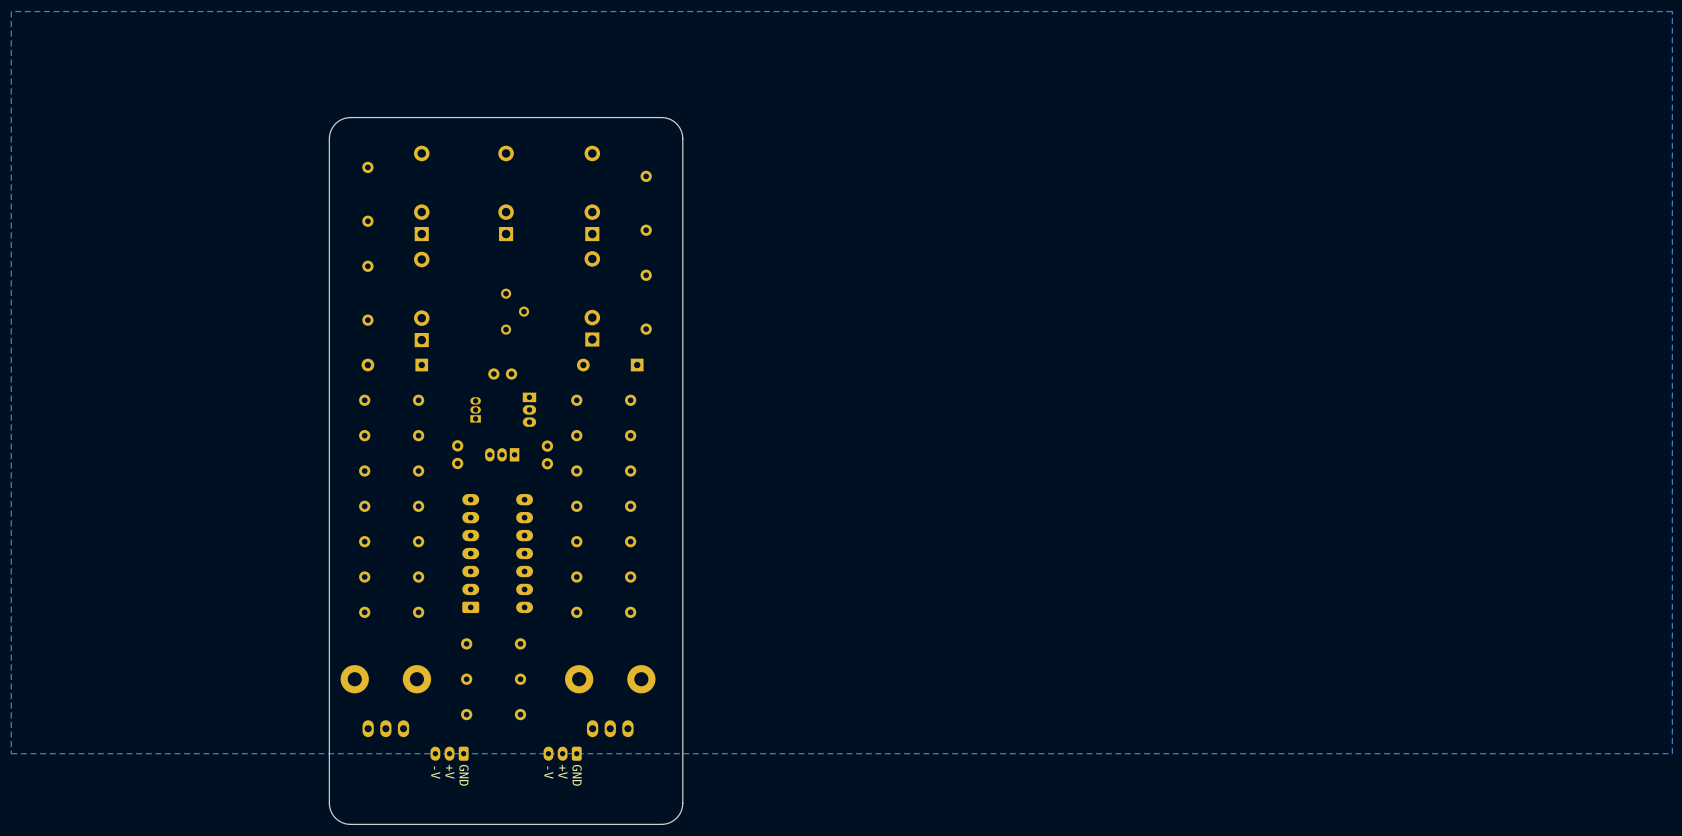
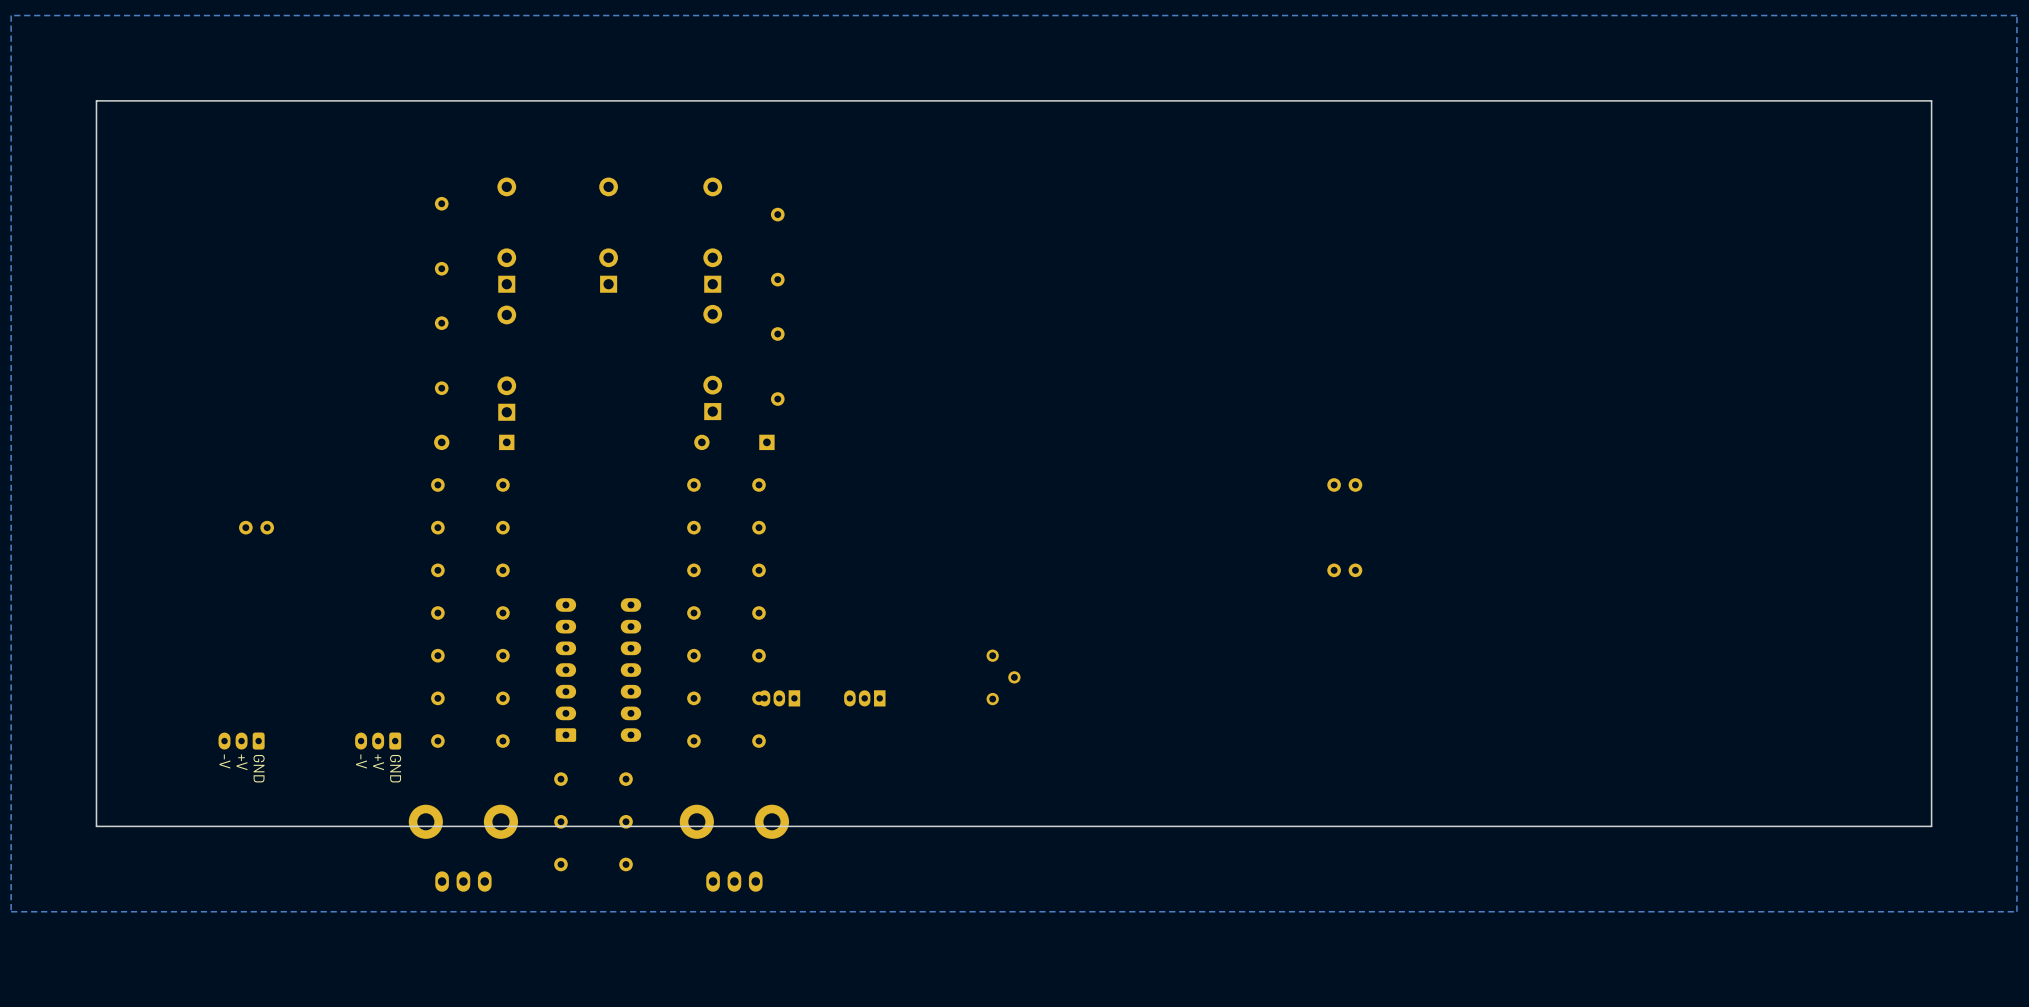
board edge: none -> (1931, 100) (96, 100) (96, 826) (1931, 826) (1931, 100)
drawing: [329, 117, 683, 825] -> none
part: (515, 311) -> none
part: (502, 374) -> none
part: none -> (1344, 484)
part: (475, 409) -> none
part: (529, 409) -> none
part: none -> (256, 527)
part: (457, 454) -> none
part: (502, 454) -> none
part: (547, 454) -> none
part: none -> (1344, 570)
part: none -> (1003, 677)
part: none -> (779, 698)
part: none -> (864, 698)
part: none -> (241, 741)
part: none -> (378, 741)
part: (449, 753) -> none
part: (562, 753) -> none

